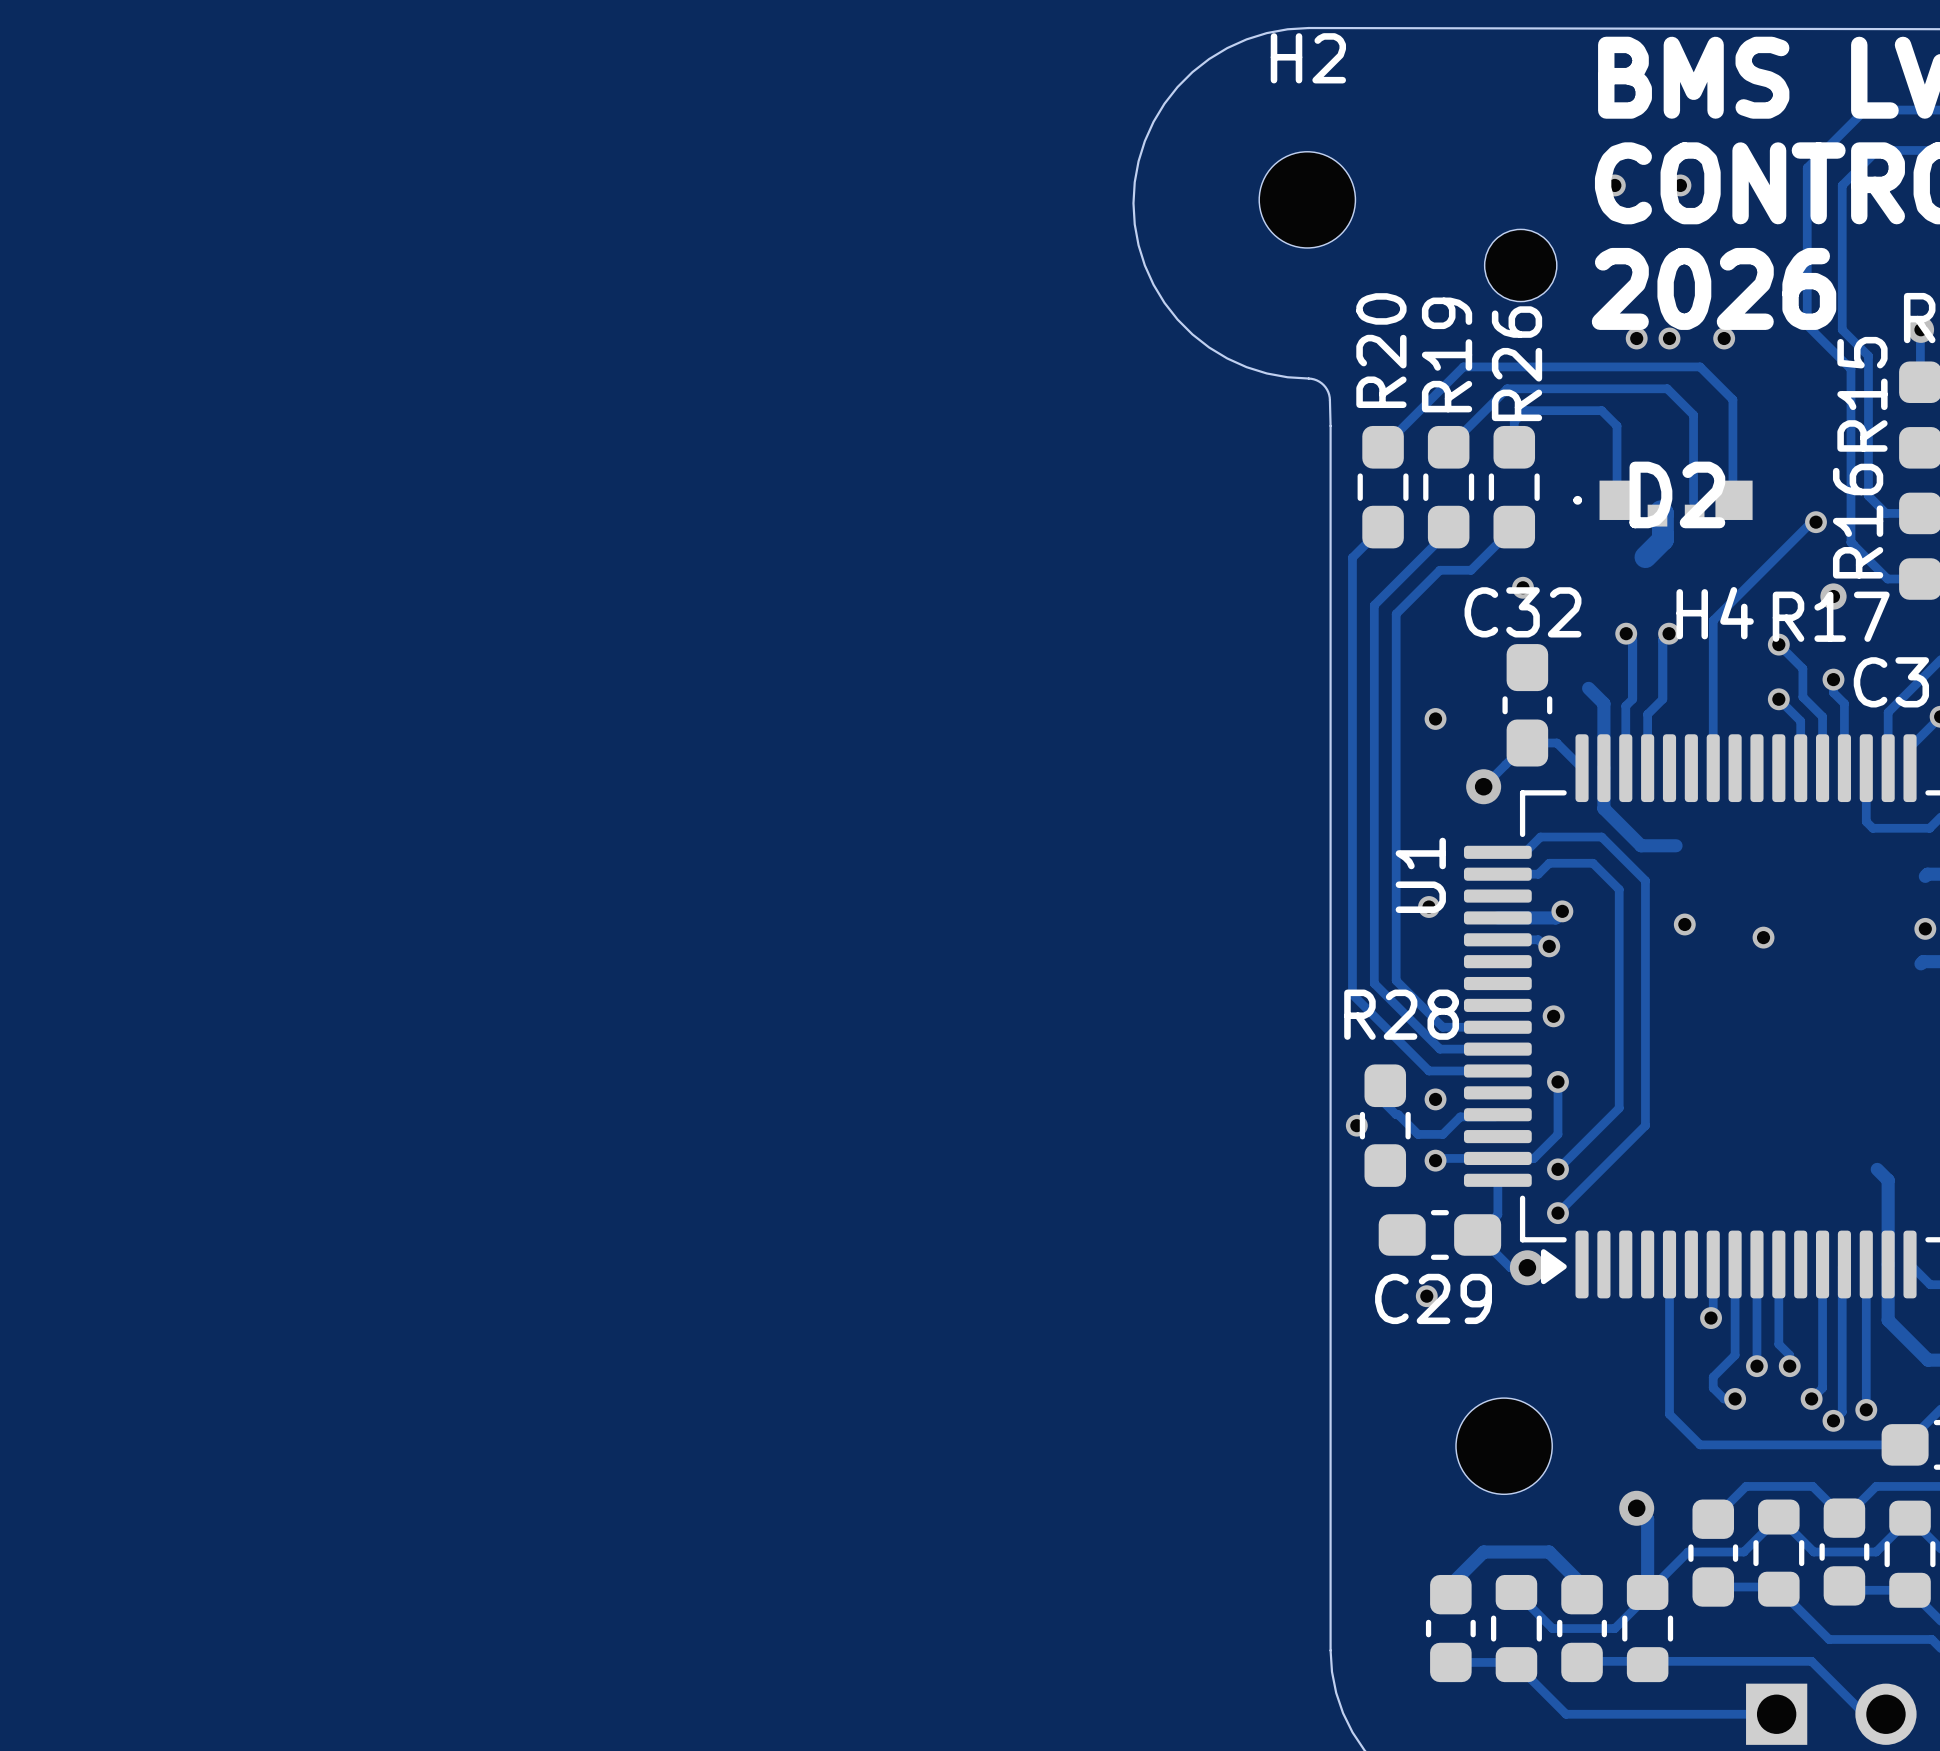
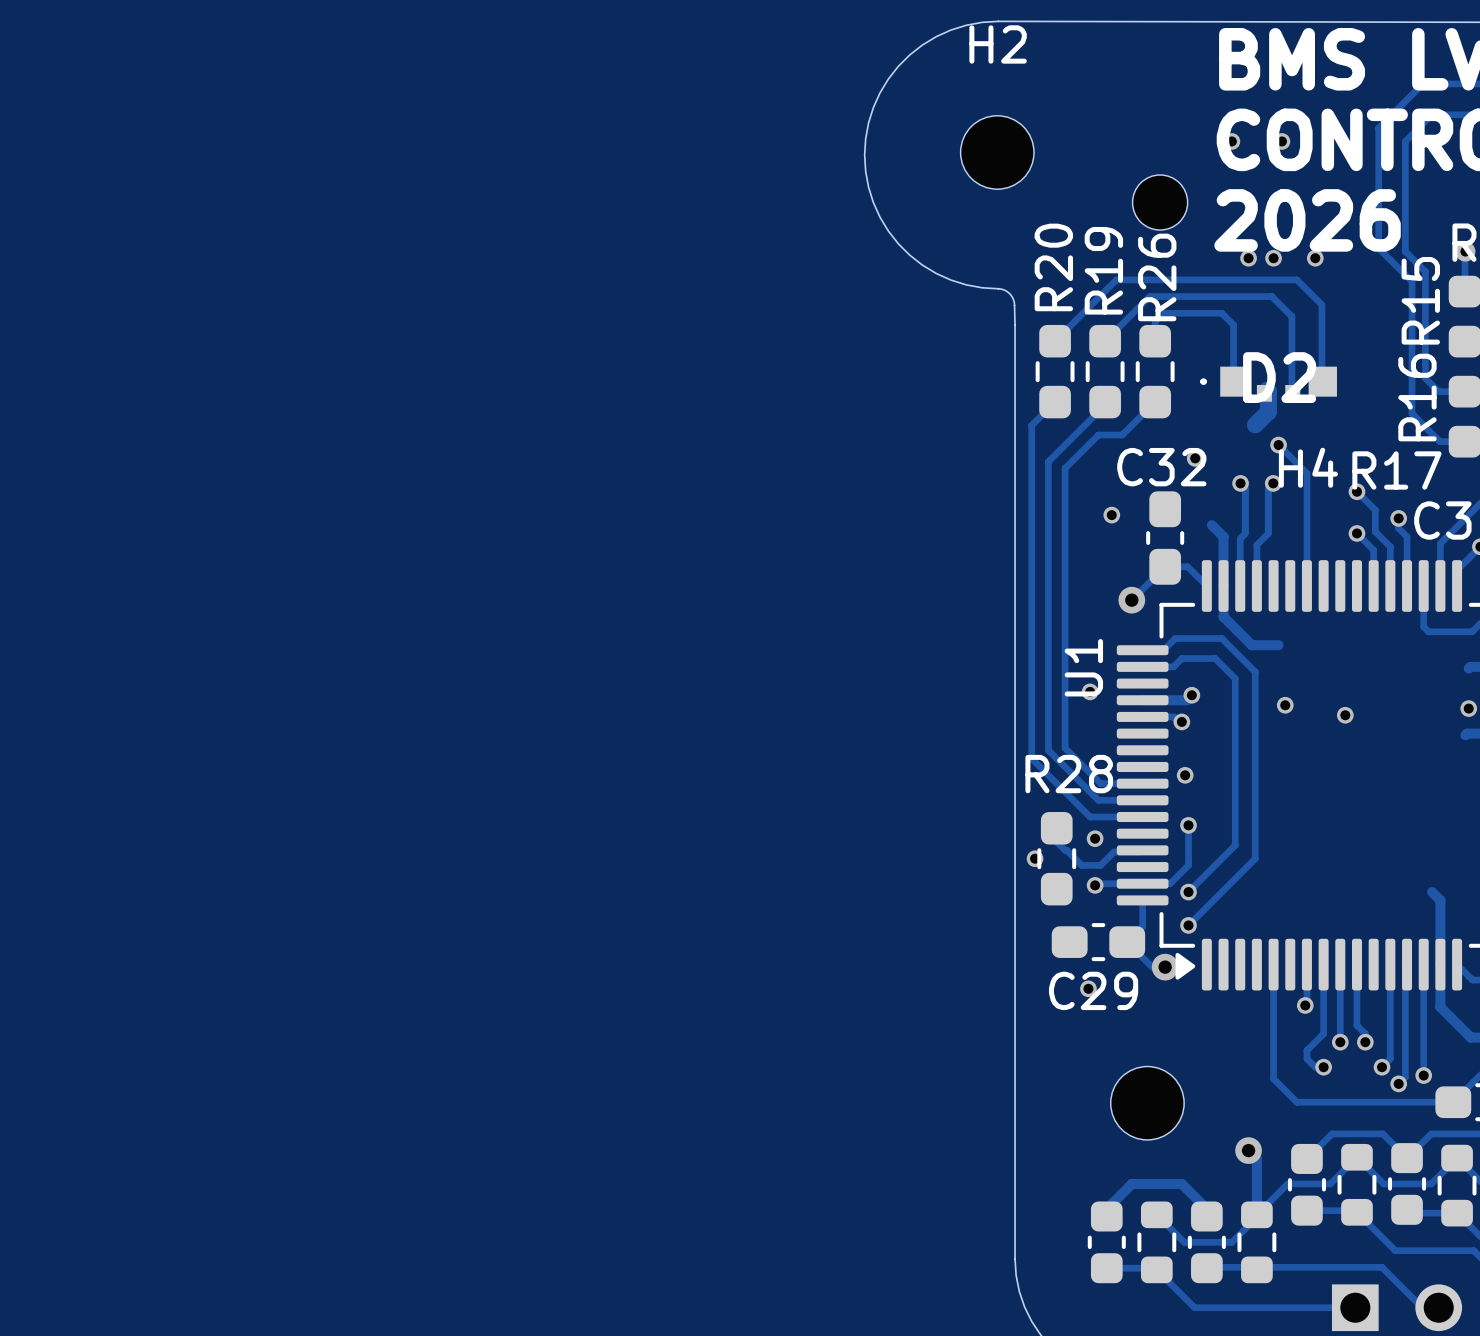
track: (1816, 522) (1811, 522) (1713, 620) -> (1278, 445) (1306, 473)
via: (1816, 522) -> none
via: none -> (1278, 445)
via position: (1523, 587) -> (1195, 458)
via: (1833, 596) -> none
via position: (1435, 718) -> (1111, 515)

